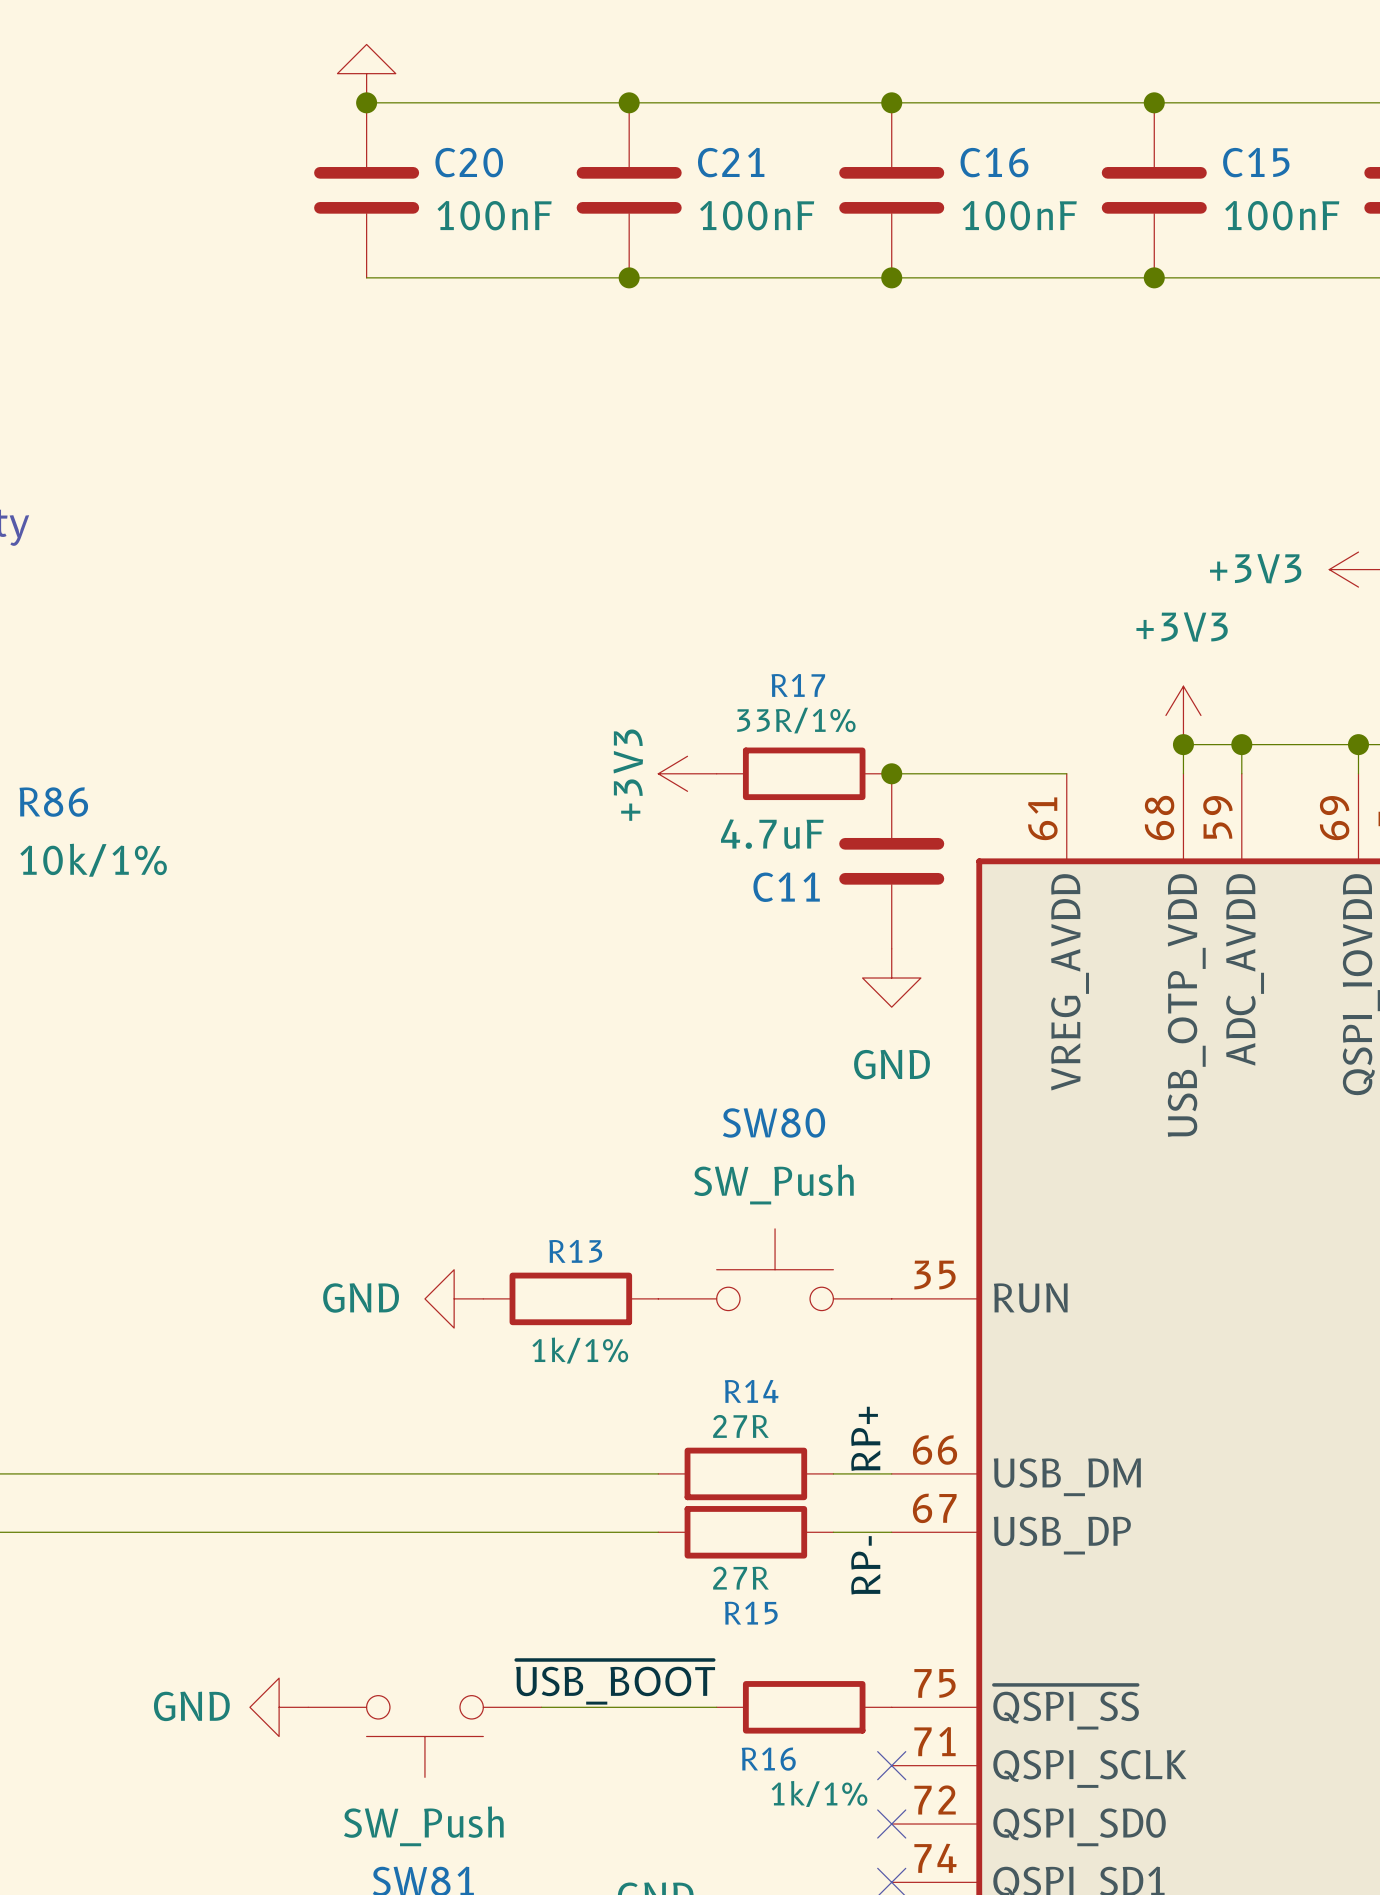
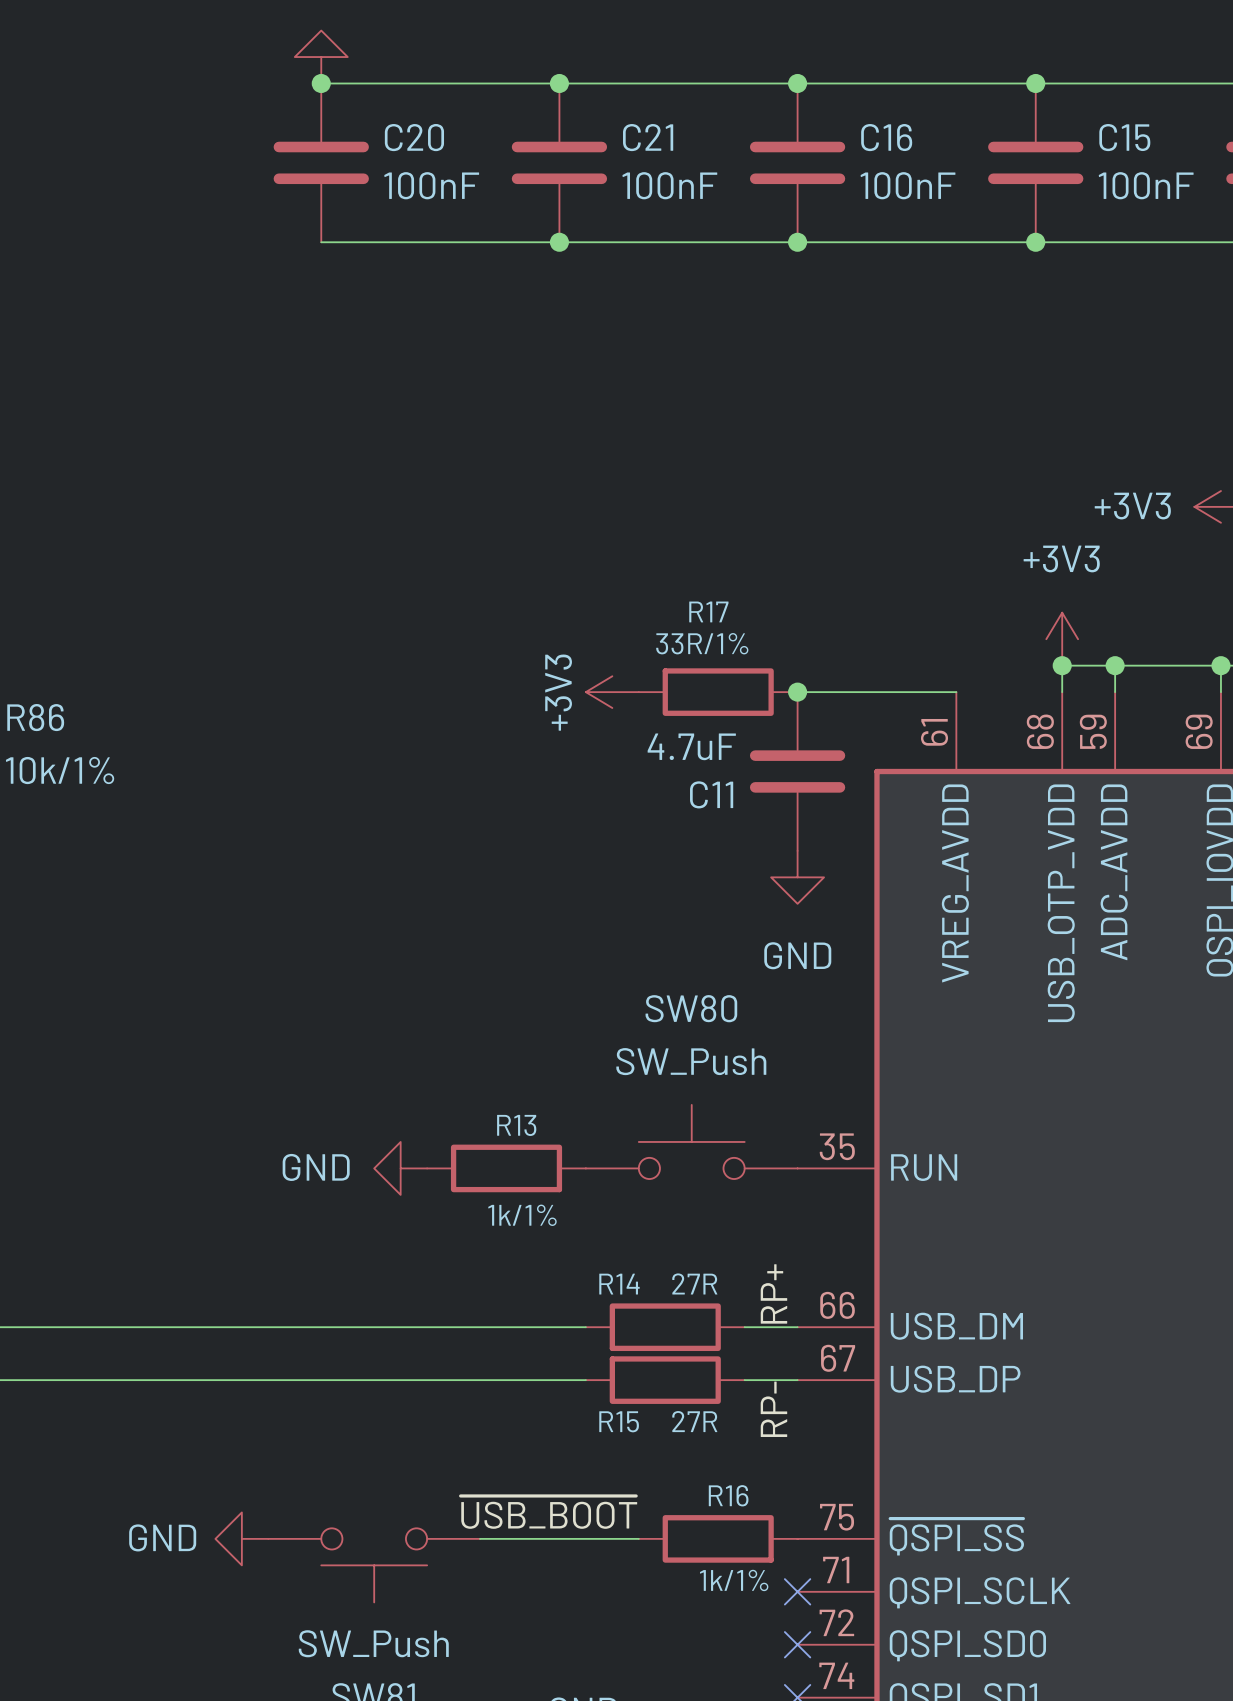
R14 name position: R14 (751, 1391) -> R14 (619, 1284)
R14 value position: 27R (740, 1426) -> 27R (694, 1283)
R15 value position: 27R (740, 1578) -> 27R (694, 1421)
R15 name position: R15 (751, 1613) -> R15 (619, 1421)
R16 name position: R16 (768, 1759) -> R16 (728, 1495)
R16 value position: 1k/1% (819, 1793) -> 1k/1% (734, 1580)

